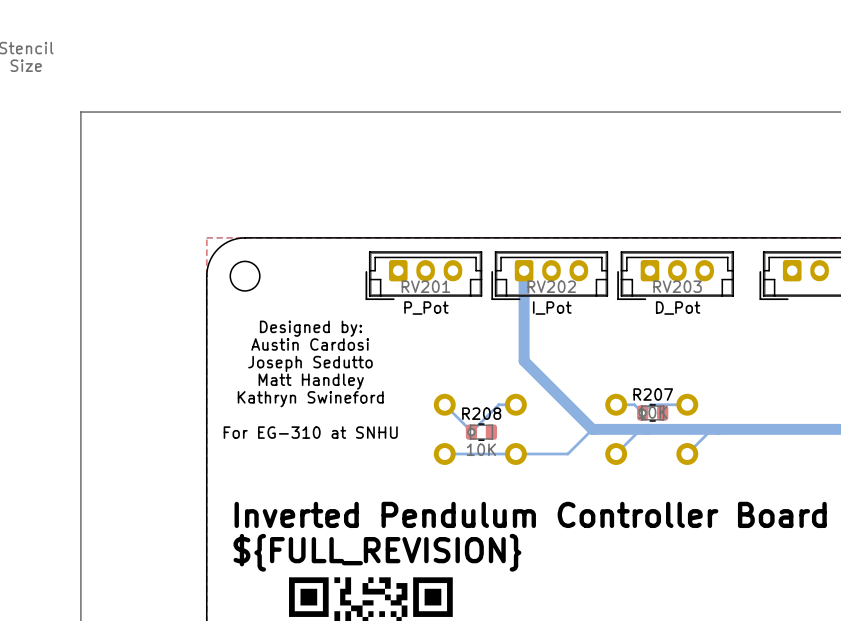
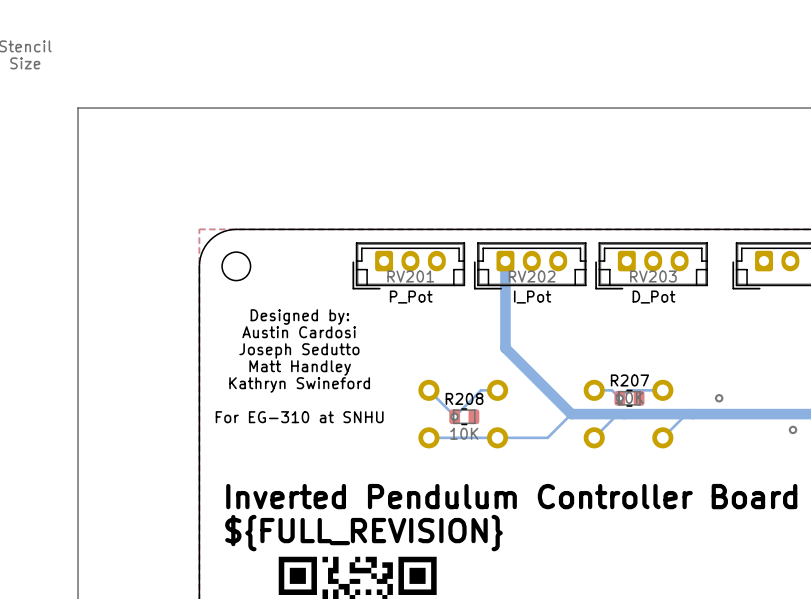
via: none -> (719, 398)
via: none -> (793, 429)

